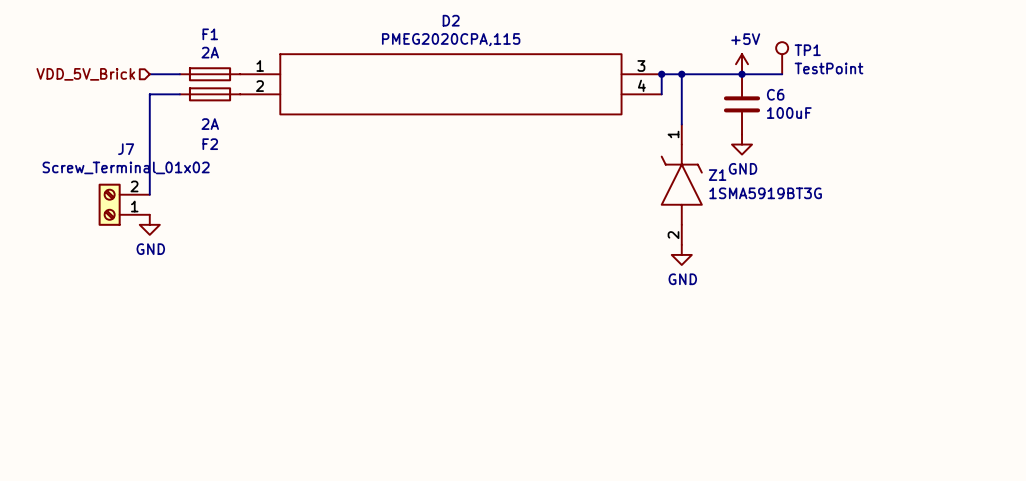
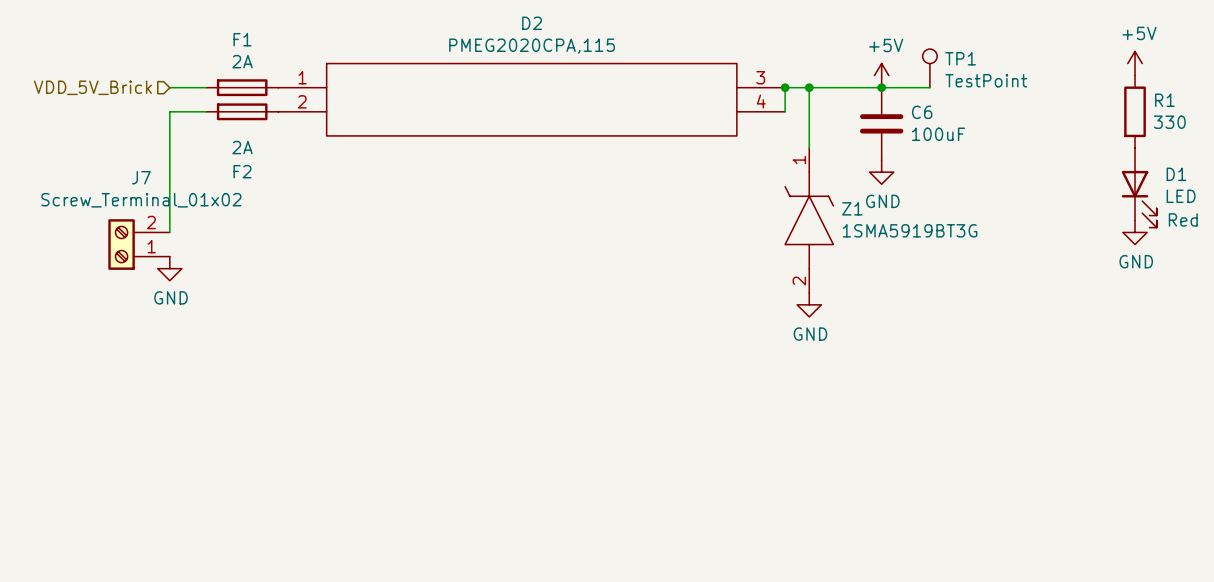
power symbol: none -> +5V (1135, 63)
R1: none -> 330 (1135, 111)
D1: none -> LED (1139, 187)
power symbol: none -> GND (1135, 232)

